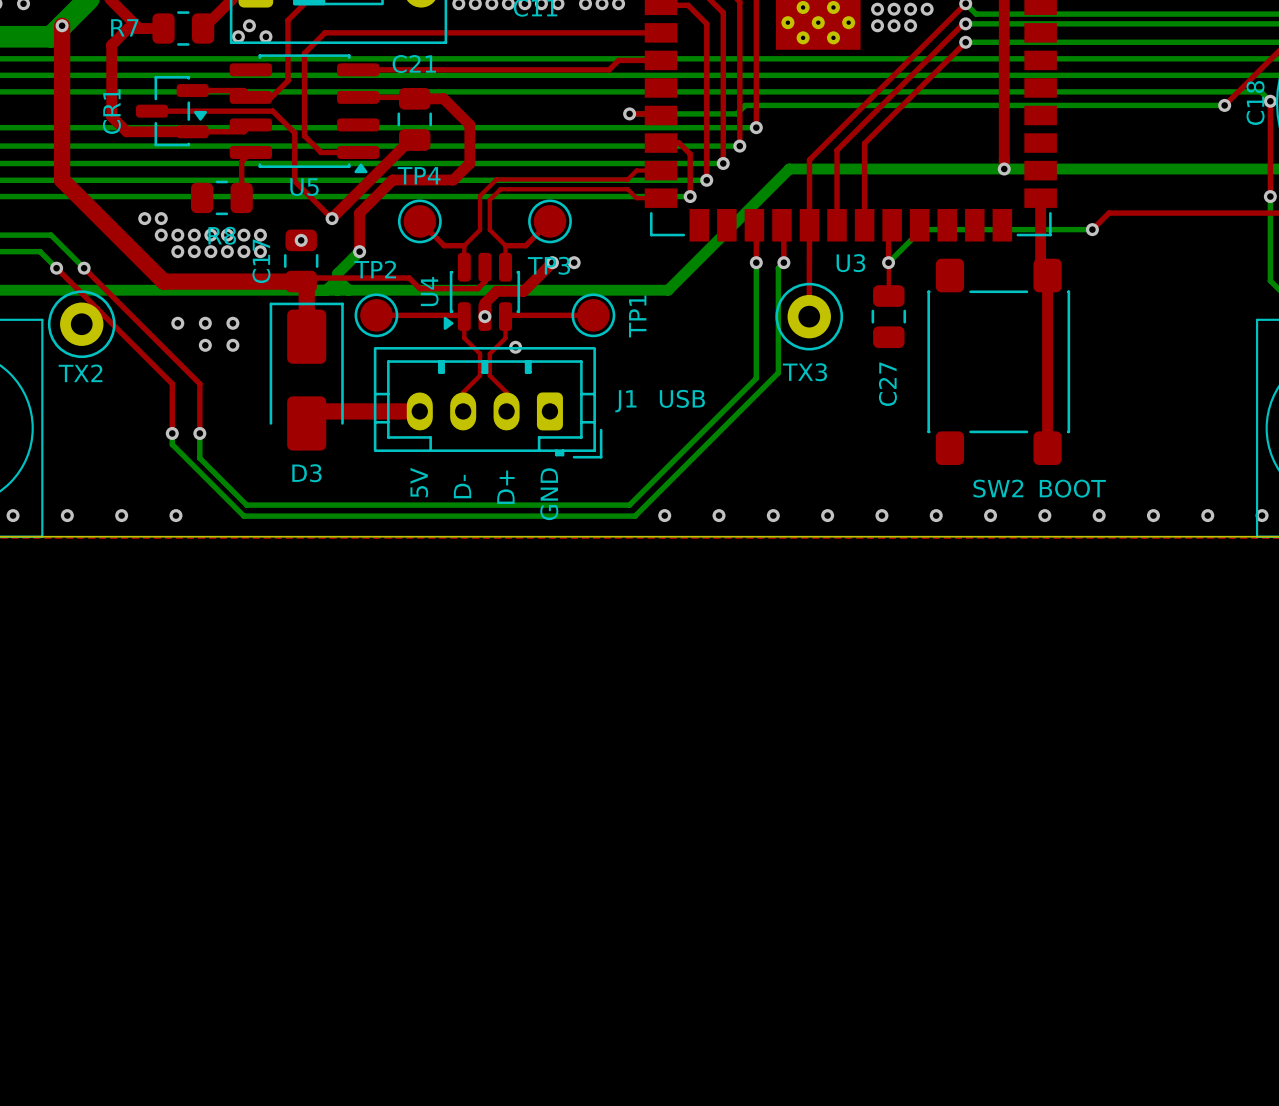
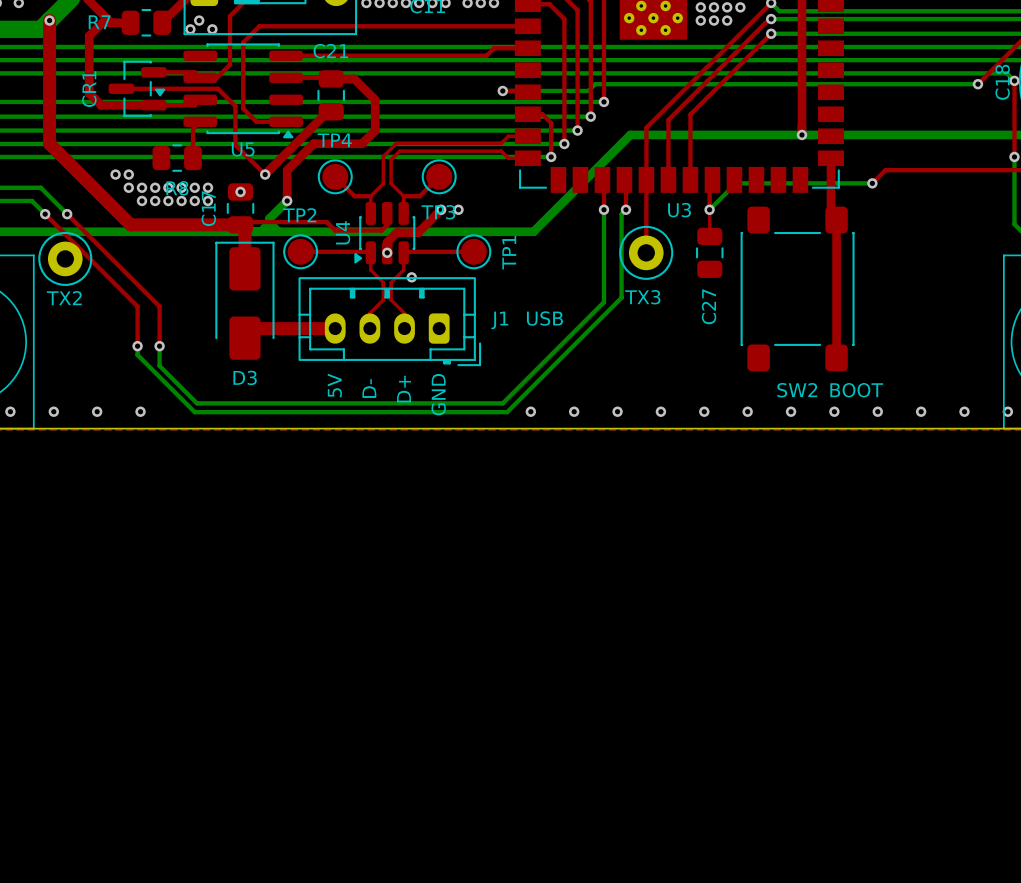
via: (177, 323) -> none
via: (205, 323) -> none
via: (232, 323) -> none
via: (205, 345) -> none
via: (232, 345) -> none

